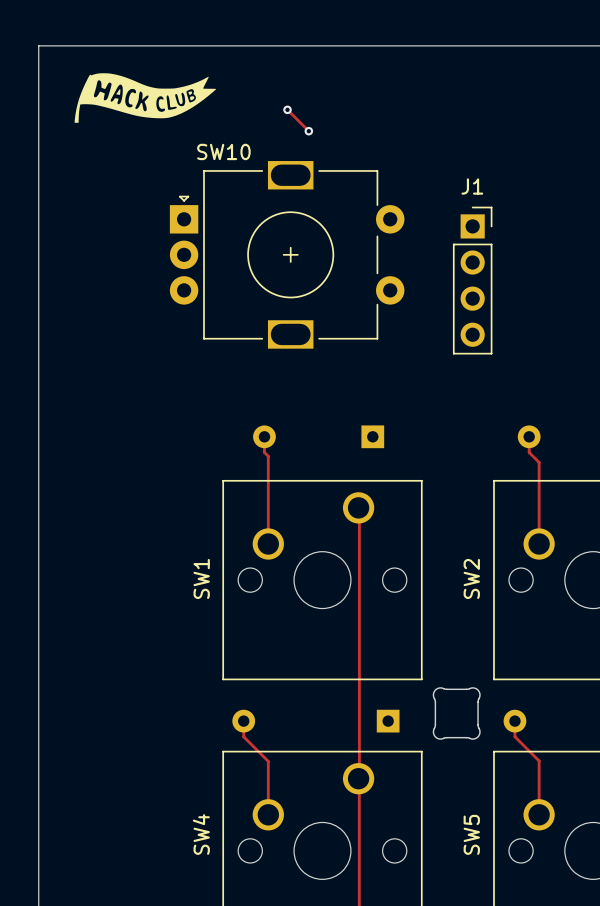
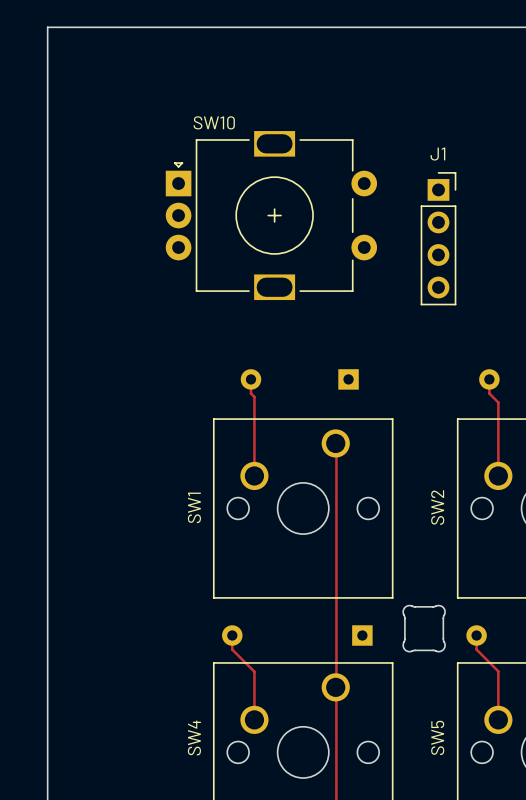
drawing: [74, 73, 217, 123] -> none
track: (287, 109) (308, 131) -> none
via: (287, 109) -> none
via: (308, 131) -> none

